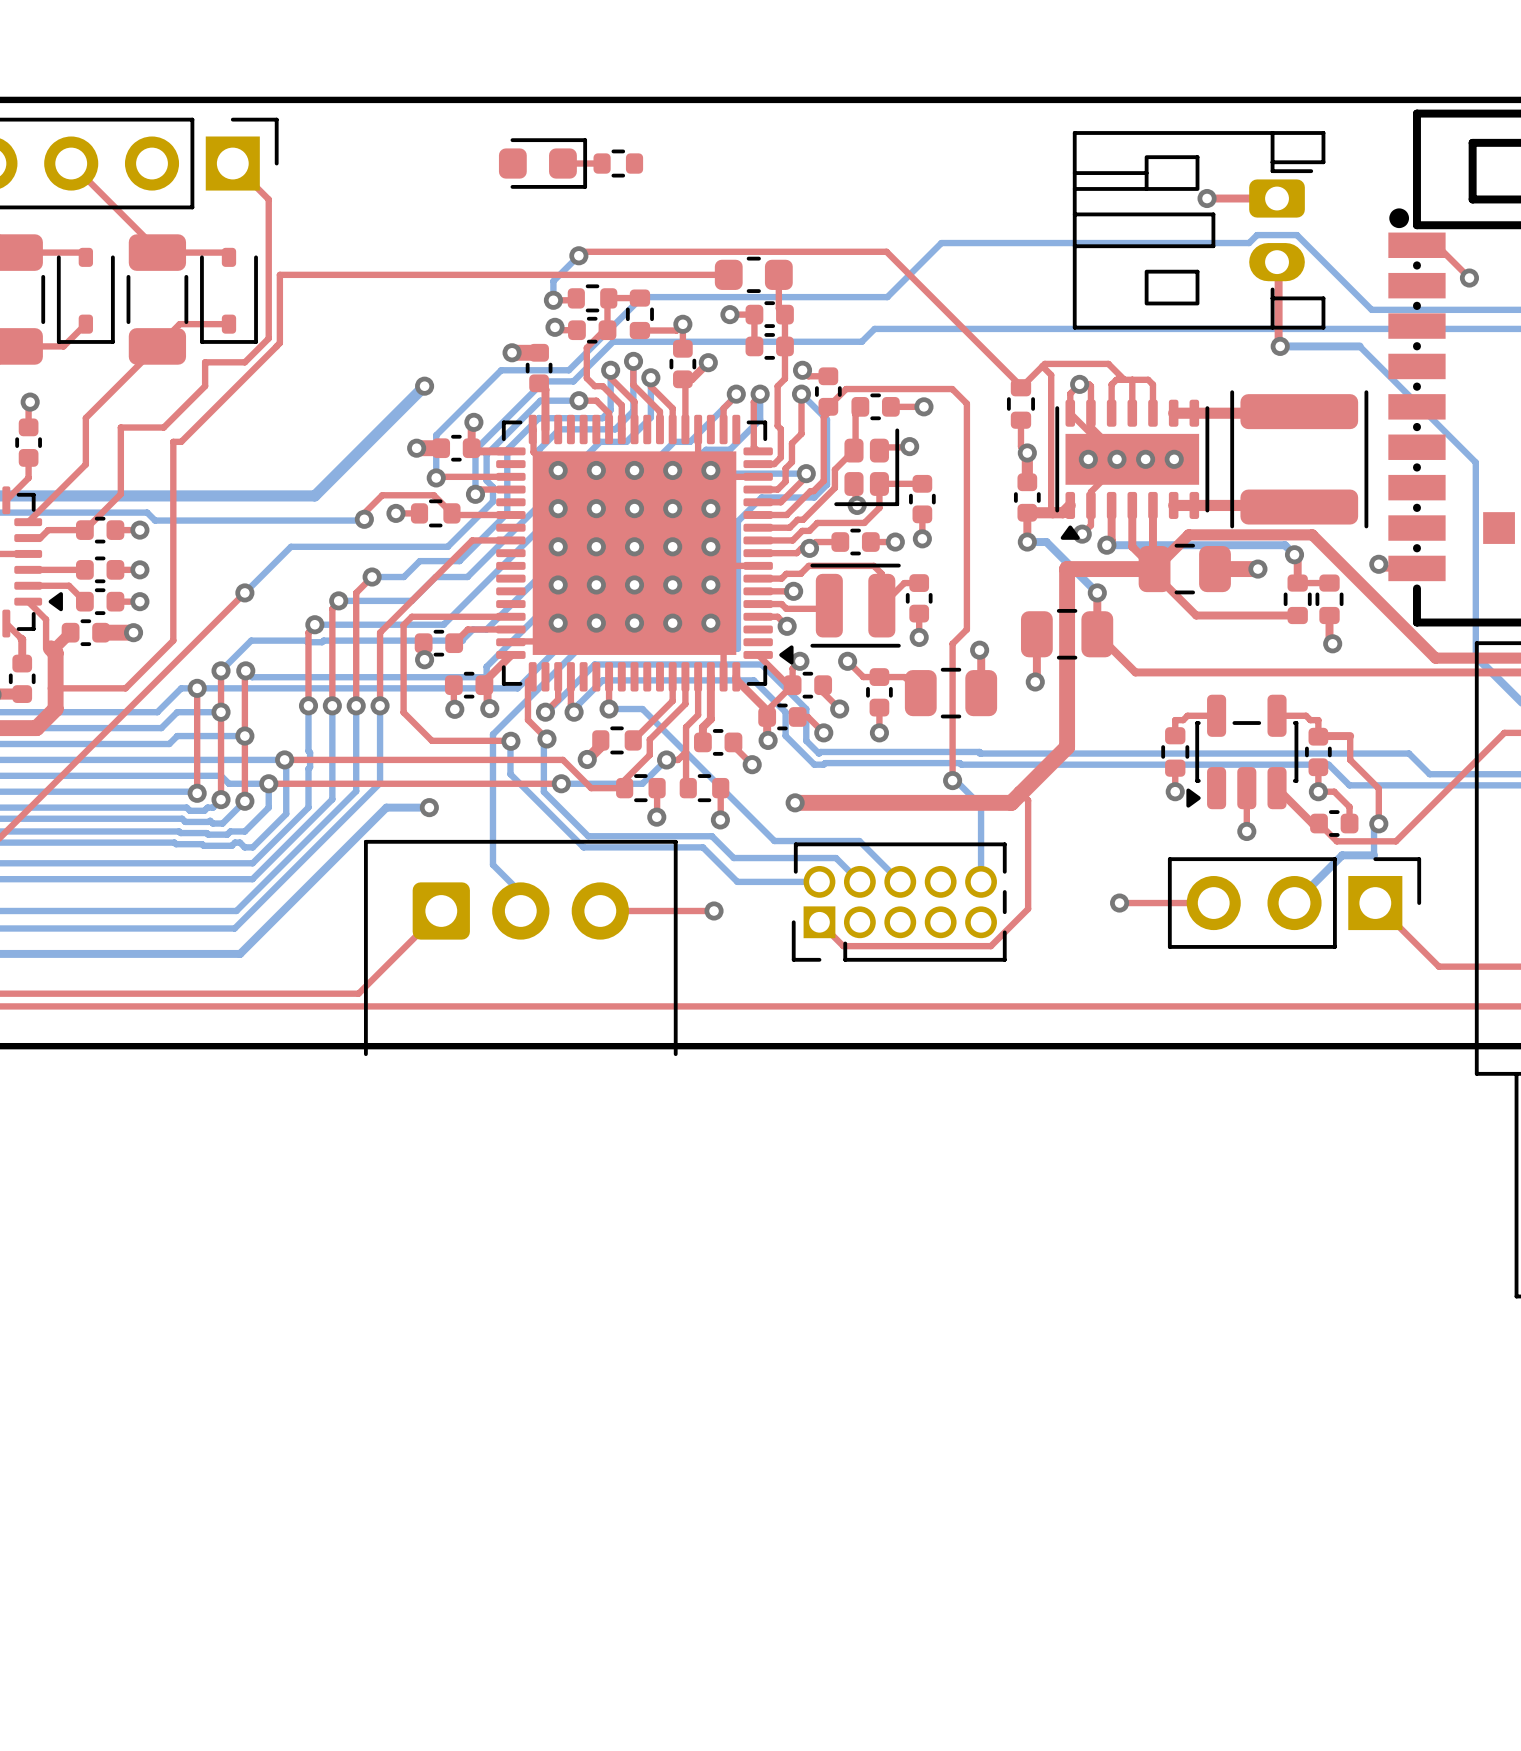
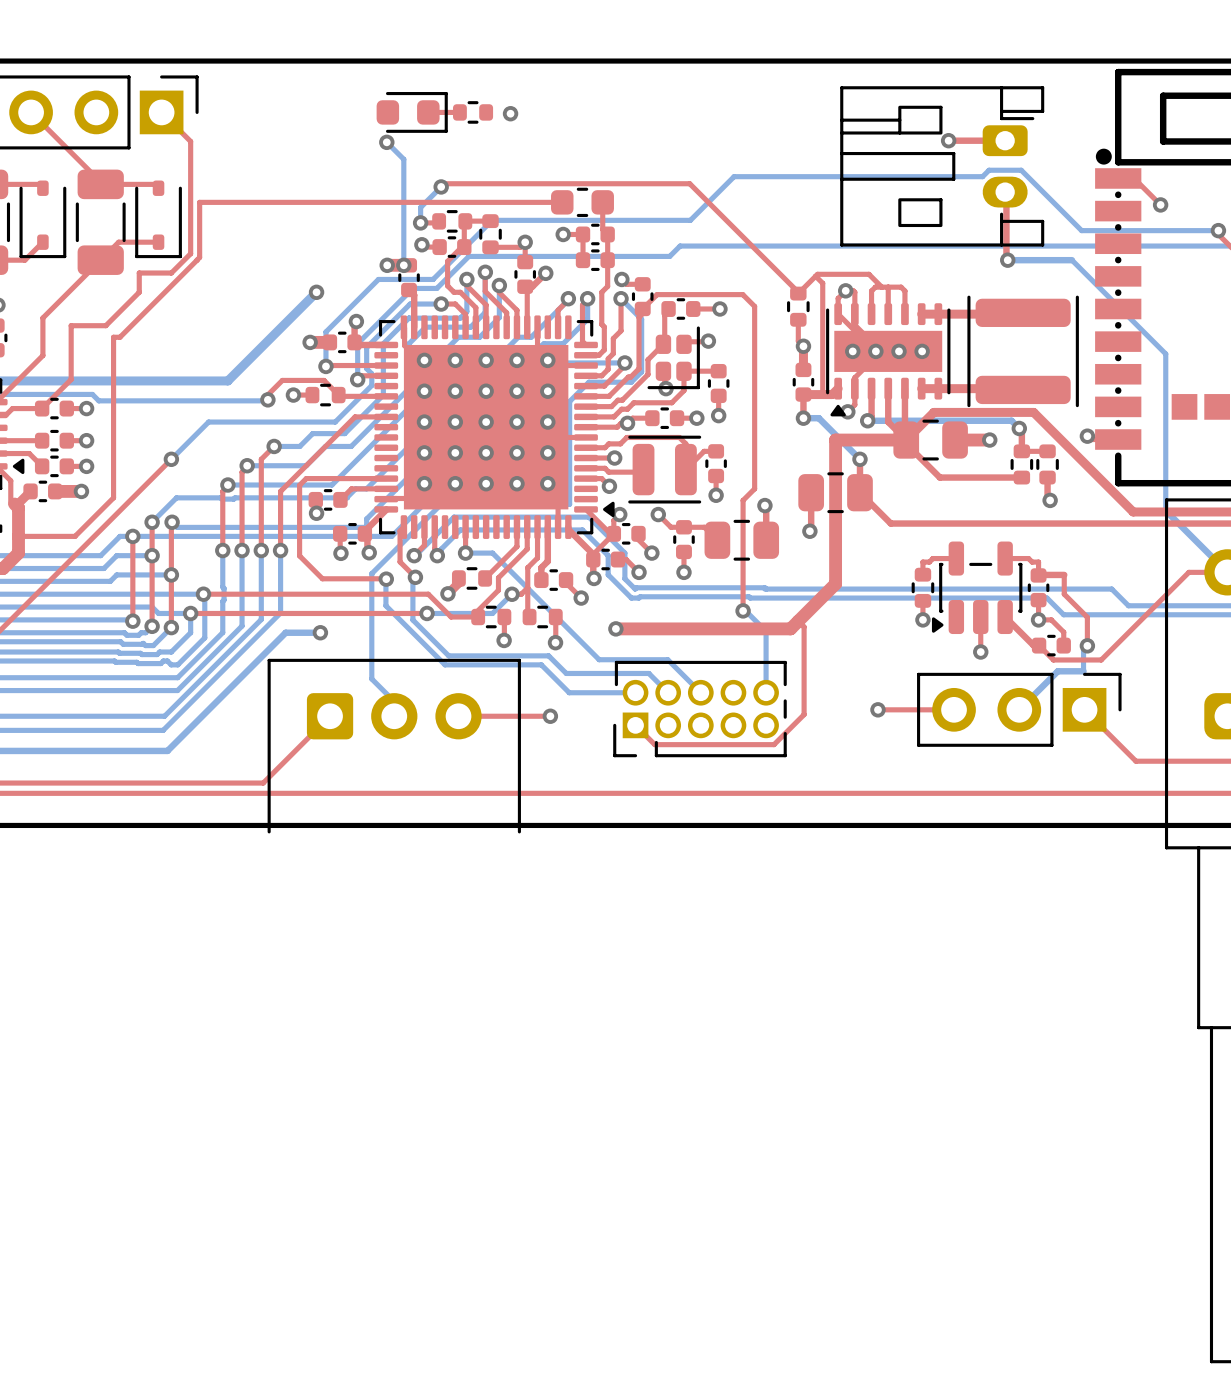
via: none -> (510, 113)
bottom track: none -> (386, 142) (403, 159) (403, 265)
via: none -> (386, 142)
via: none -> (403, 265)

